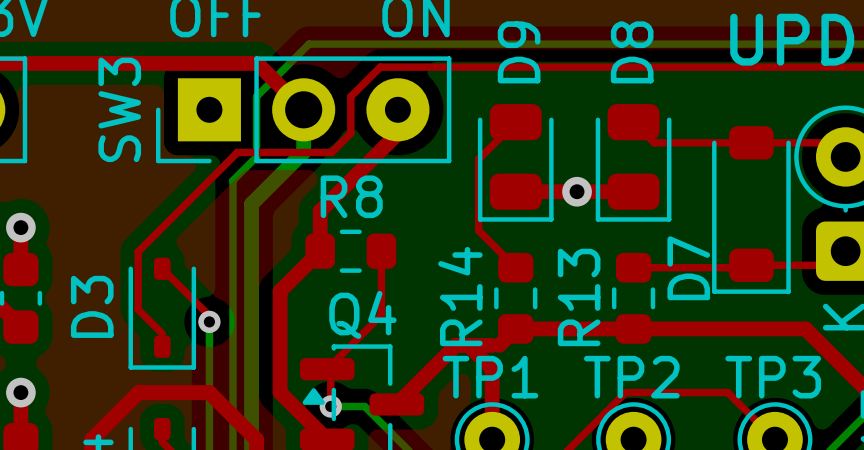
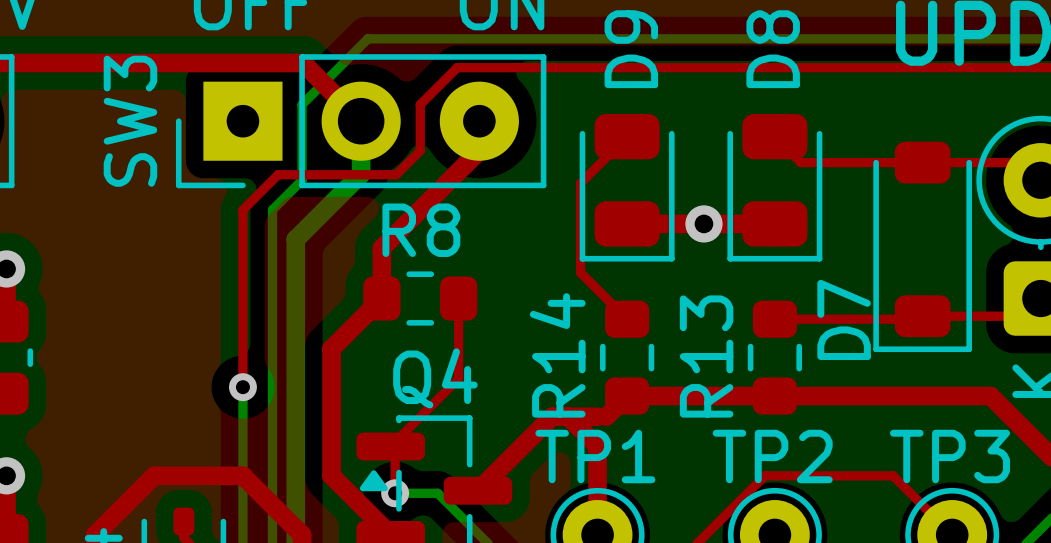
top track: (209, 180) (138, 251) (138, 309) (162, 333) -> (242, 209) (242, 379)
top track: (162, 268) (209, 315) -> none
D3: (162, 313) -> none

